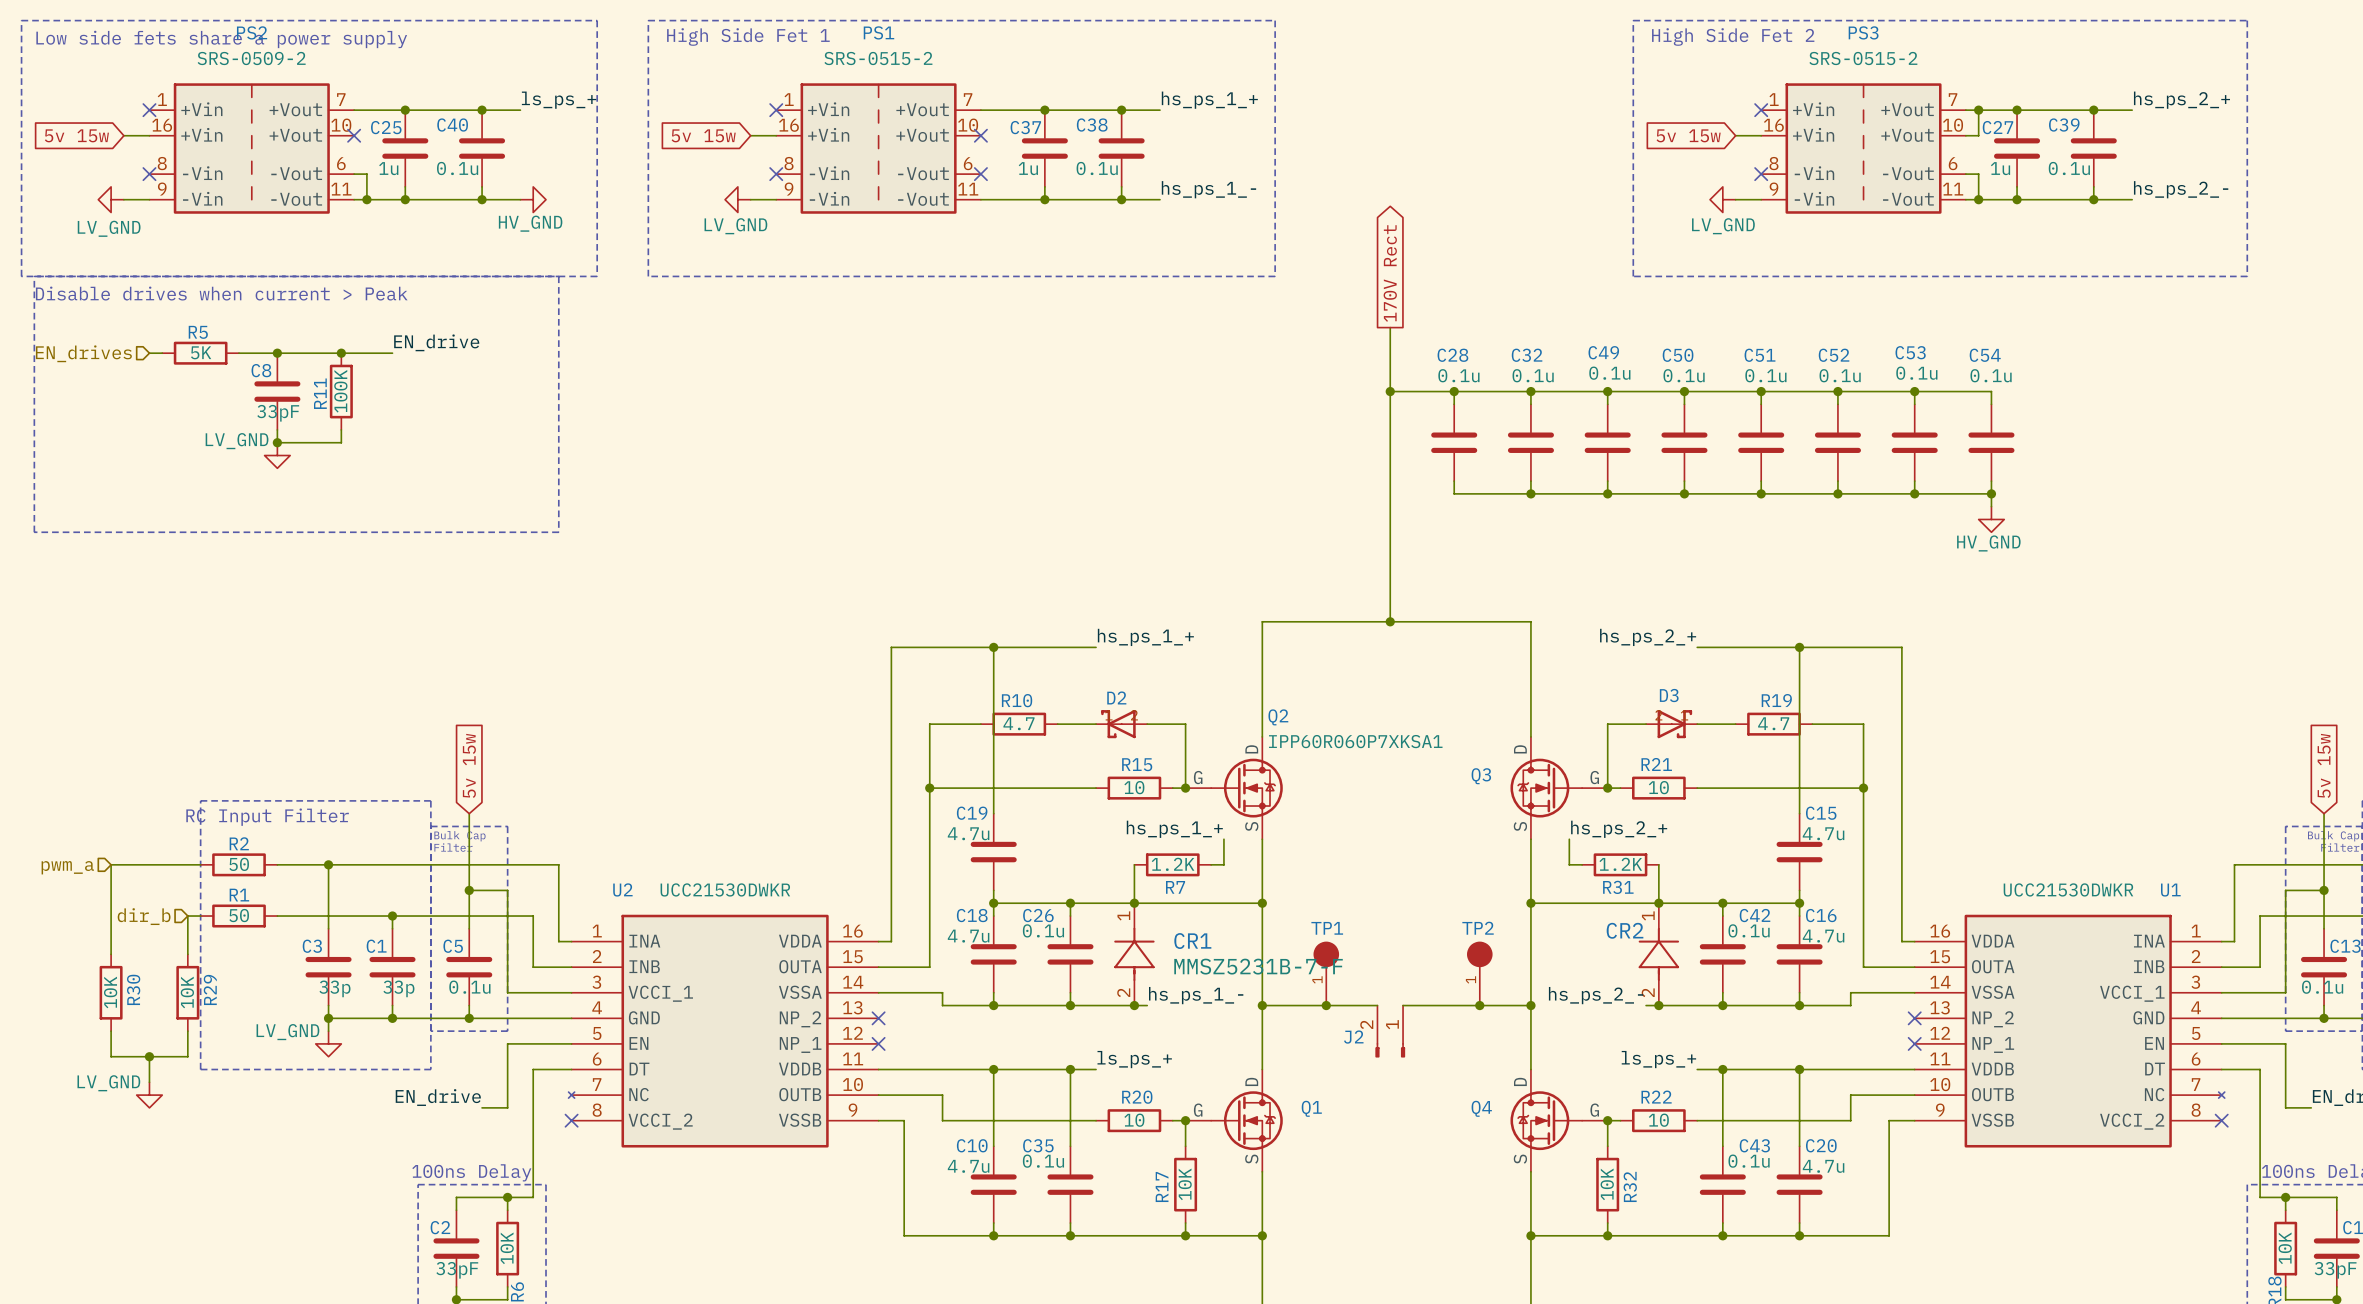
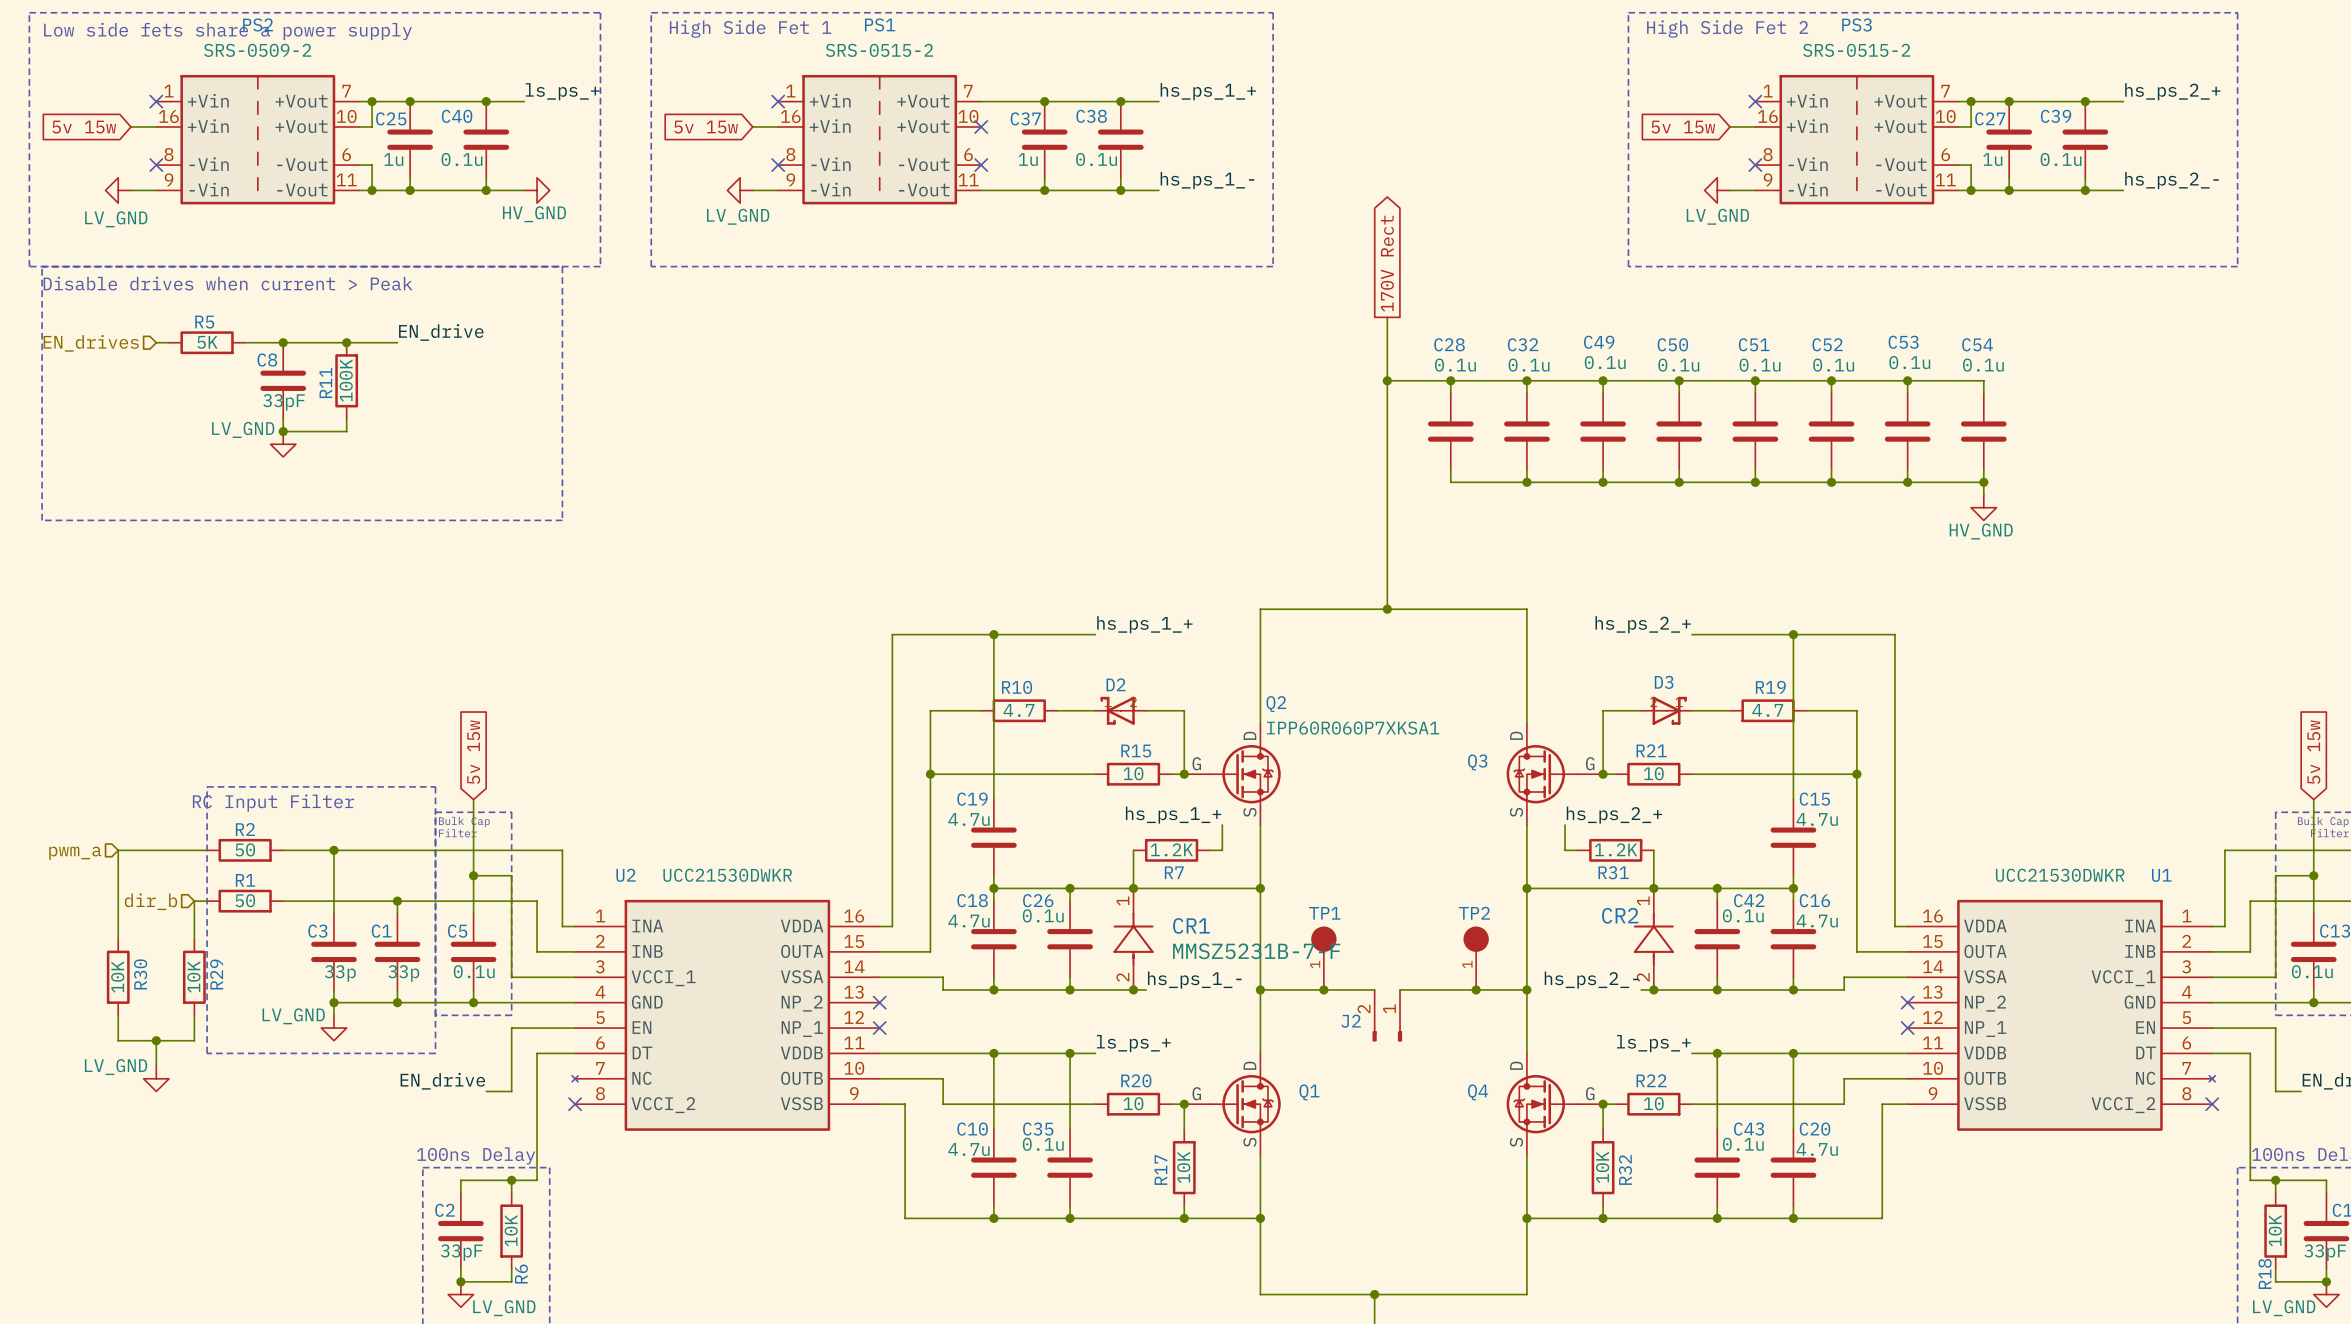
wire: none -> (372, 101) (372, 126) (359, 126)
junction: none -> (372, 101)
no-connect mark: (354, 135) -> none

